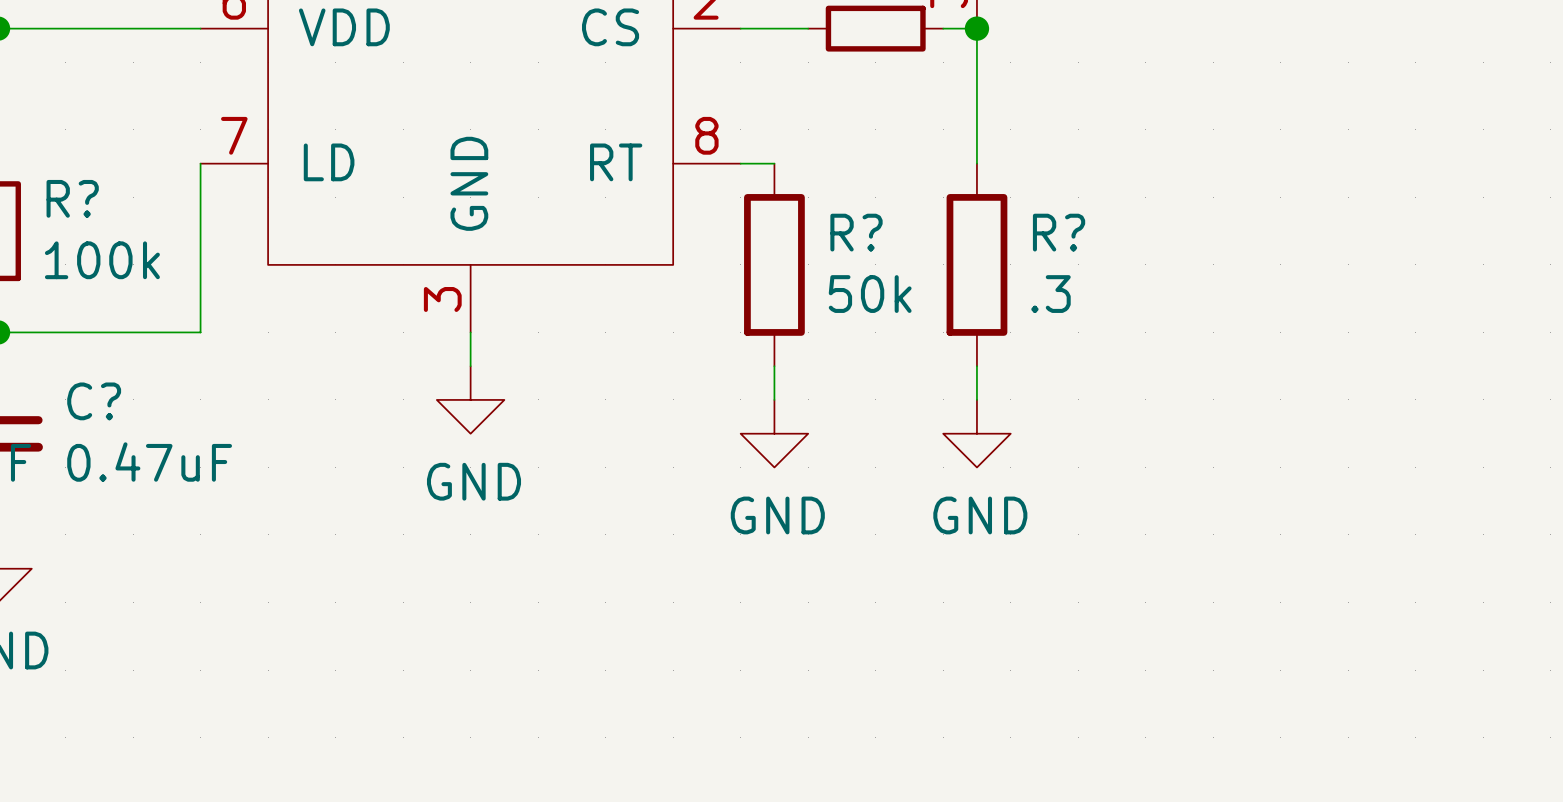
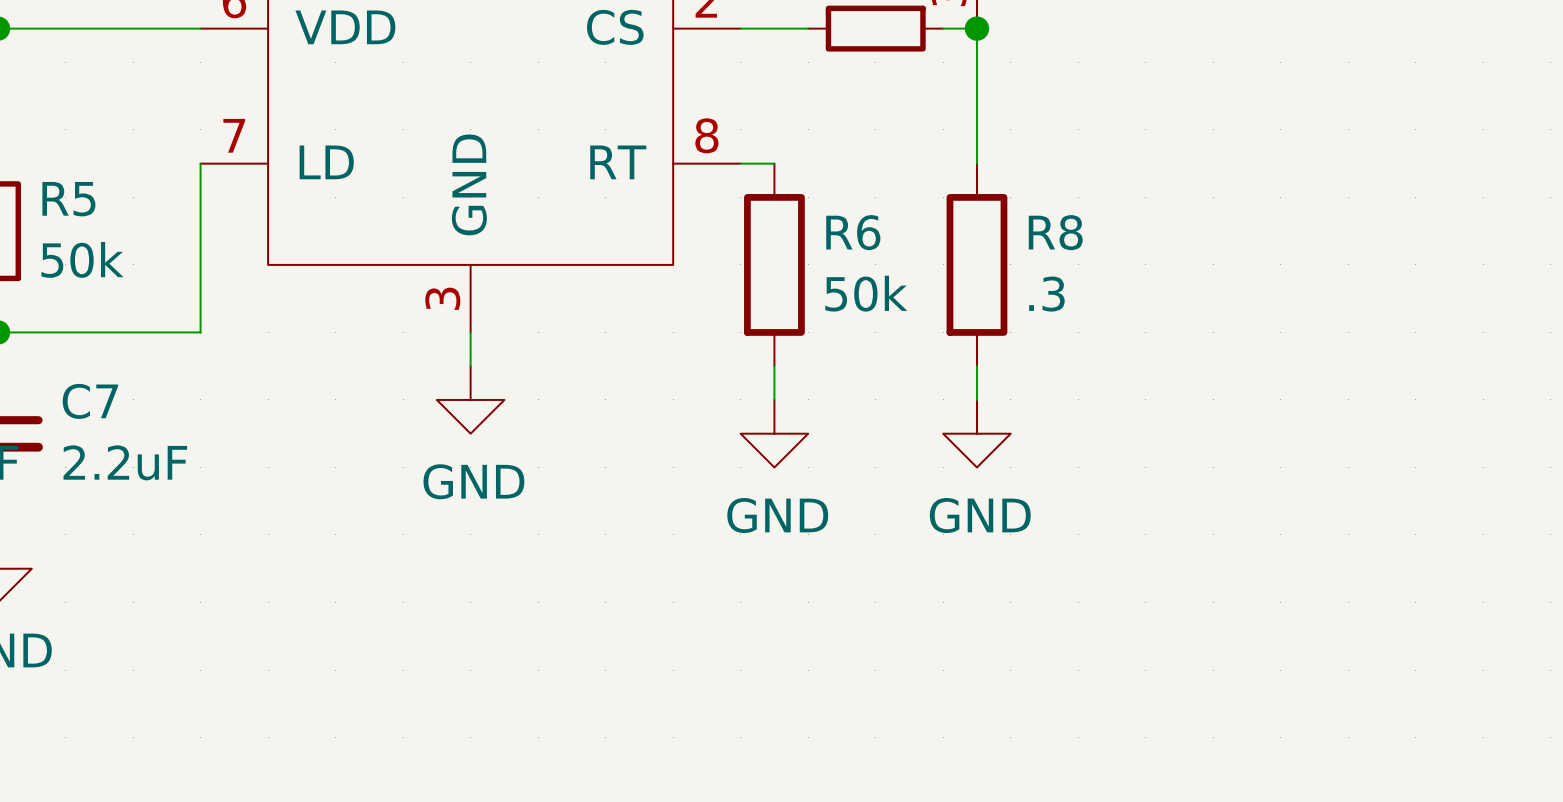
R? name: R? (72, 198) -> R5 (68, 199)
R? name: R? (856, 232) -> R6 (853, 232)
R? name: R? (1059, 232) -> R8 (1055, 232)
R? value: 100k (102, 260) -> 50k (82, 259)
C? name: C? (94, 401) -> C7 (90, 401)
C? value: 0.47uF (149, 462) -> 2.2uF (125, 462)

